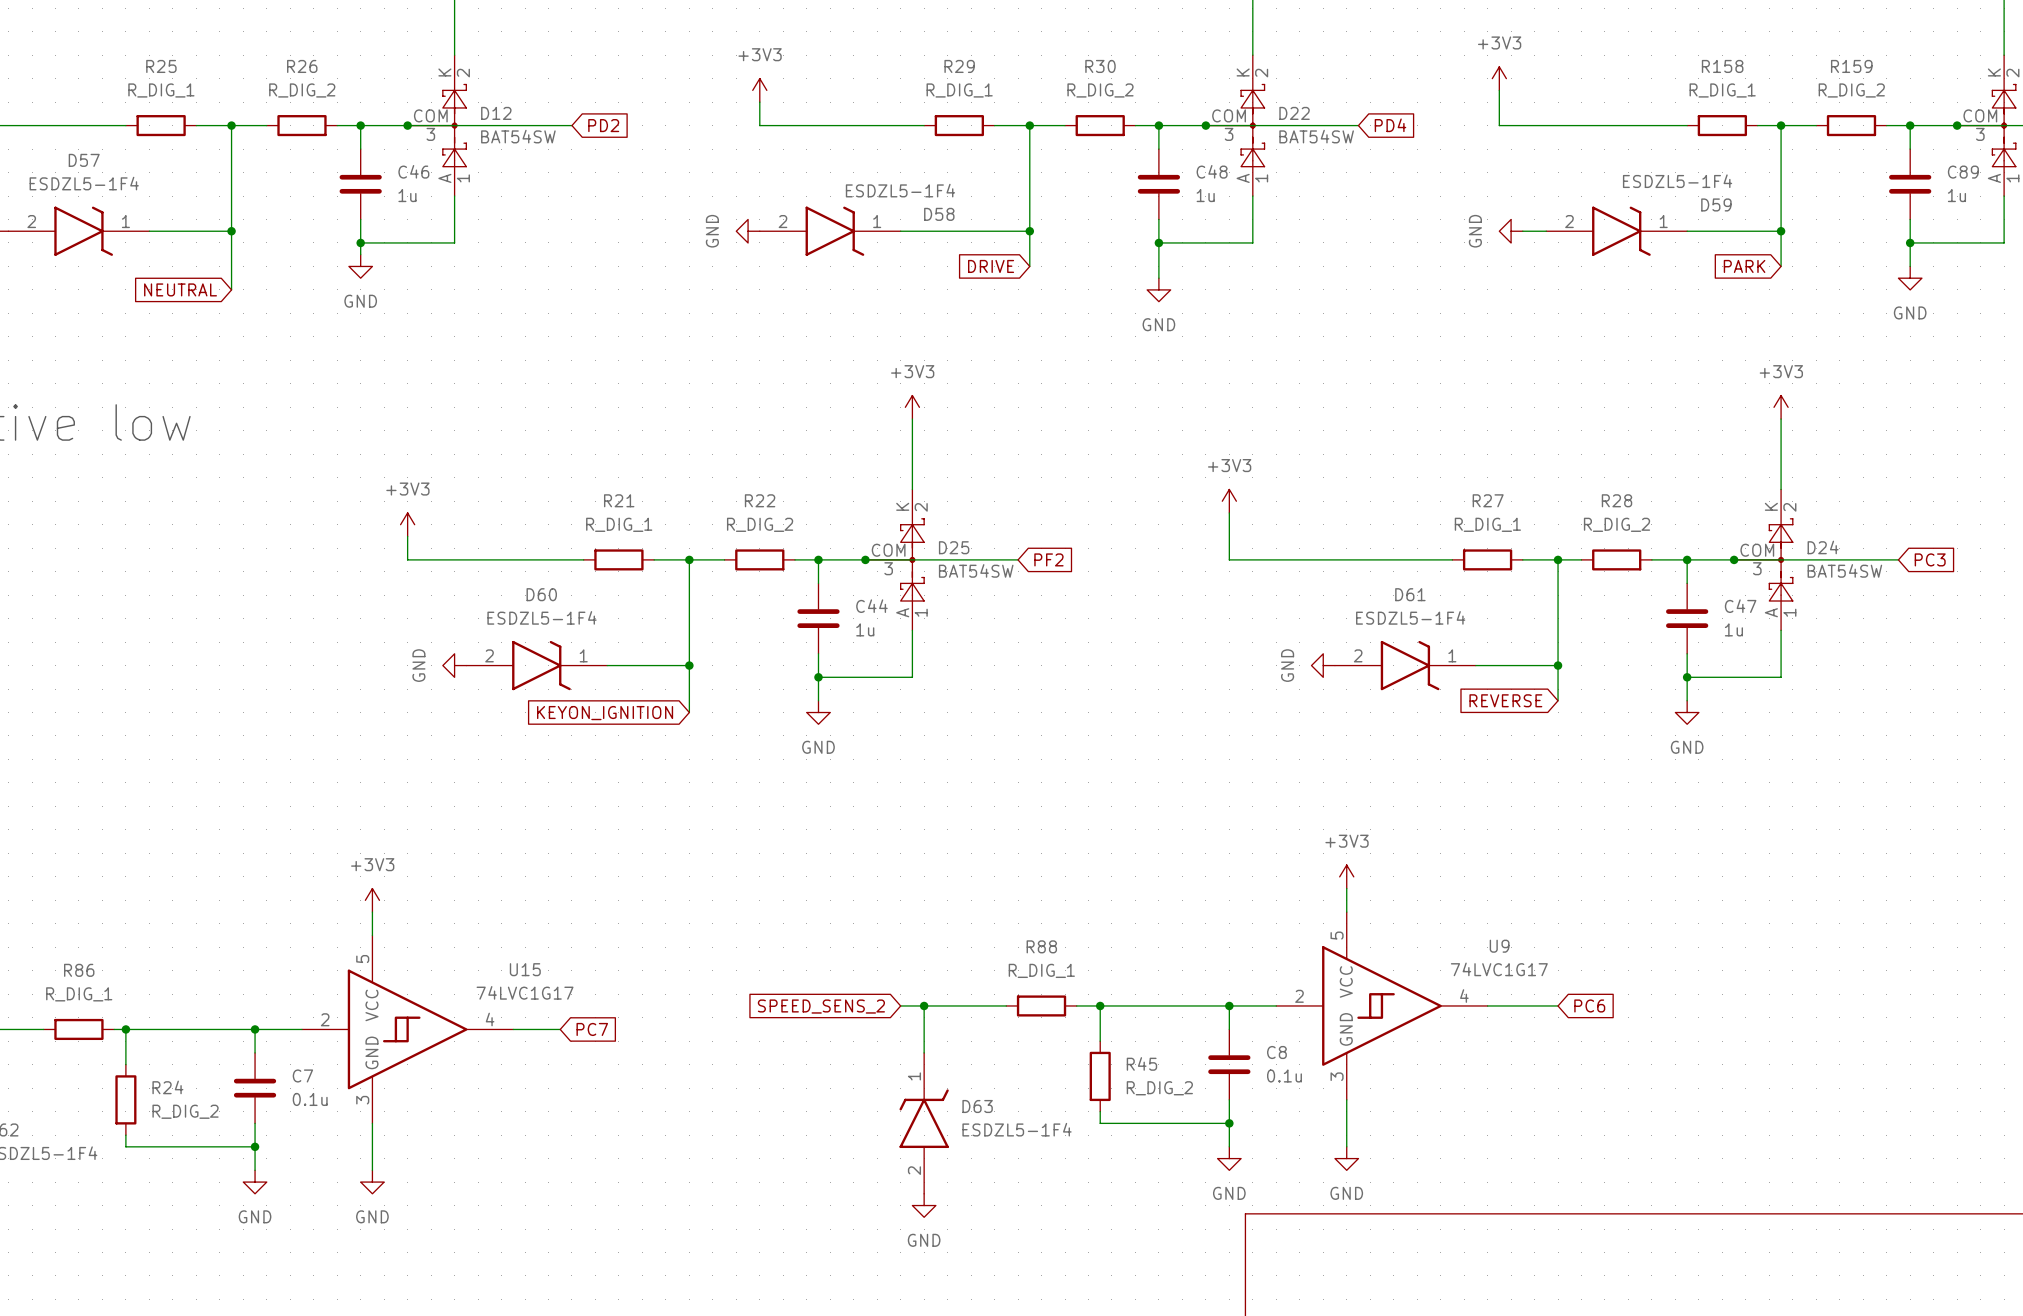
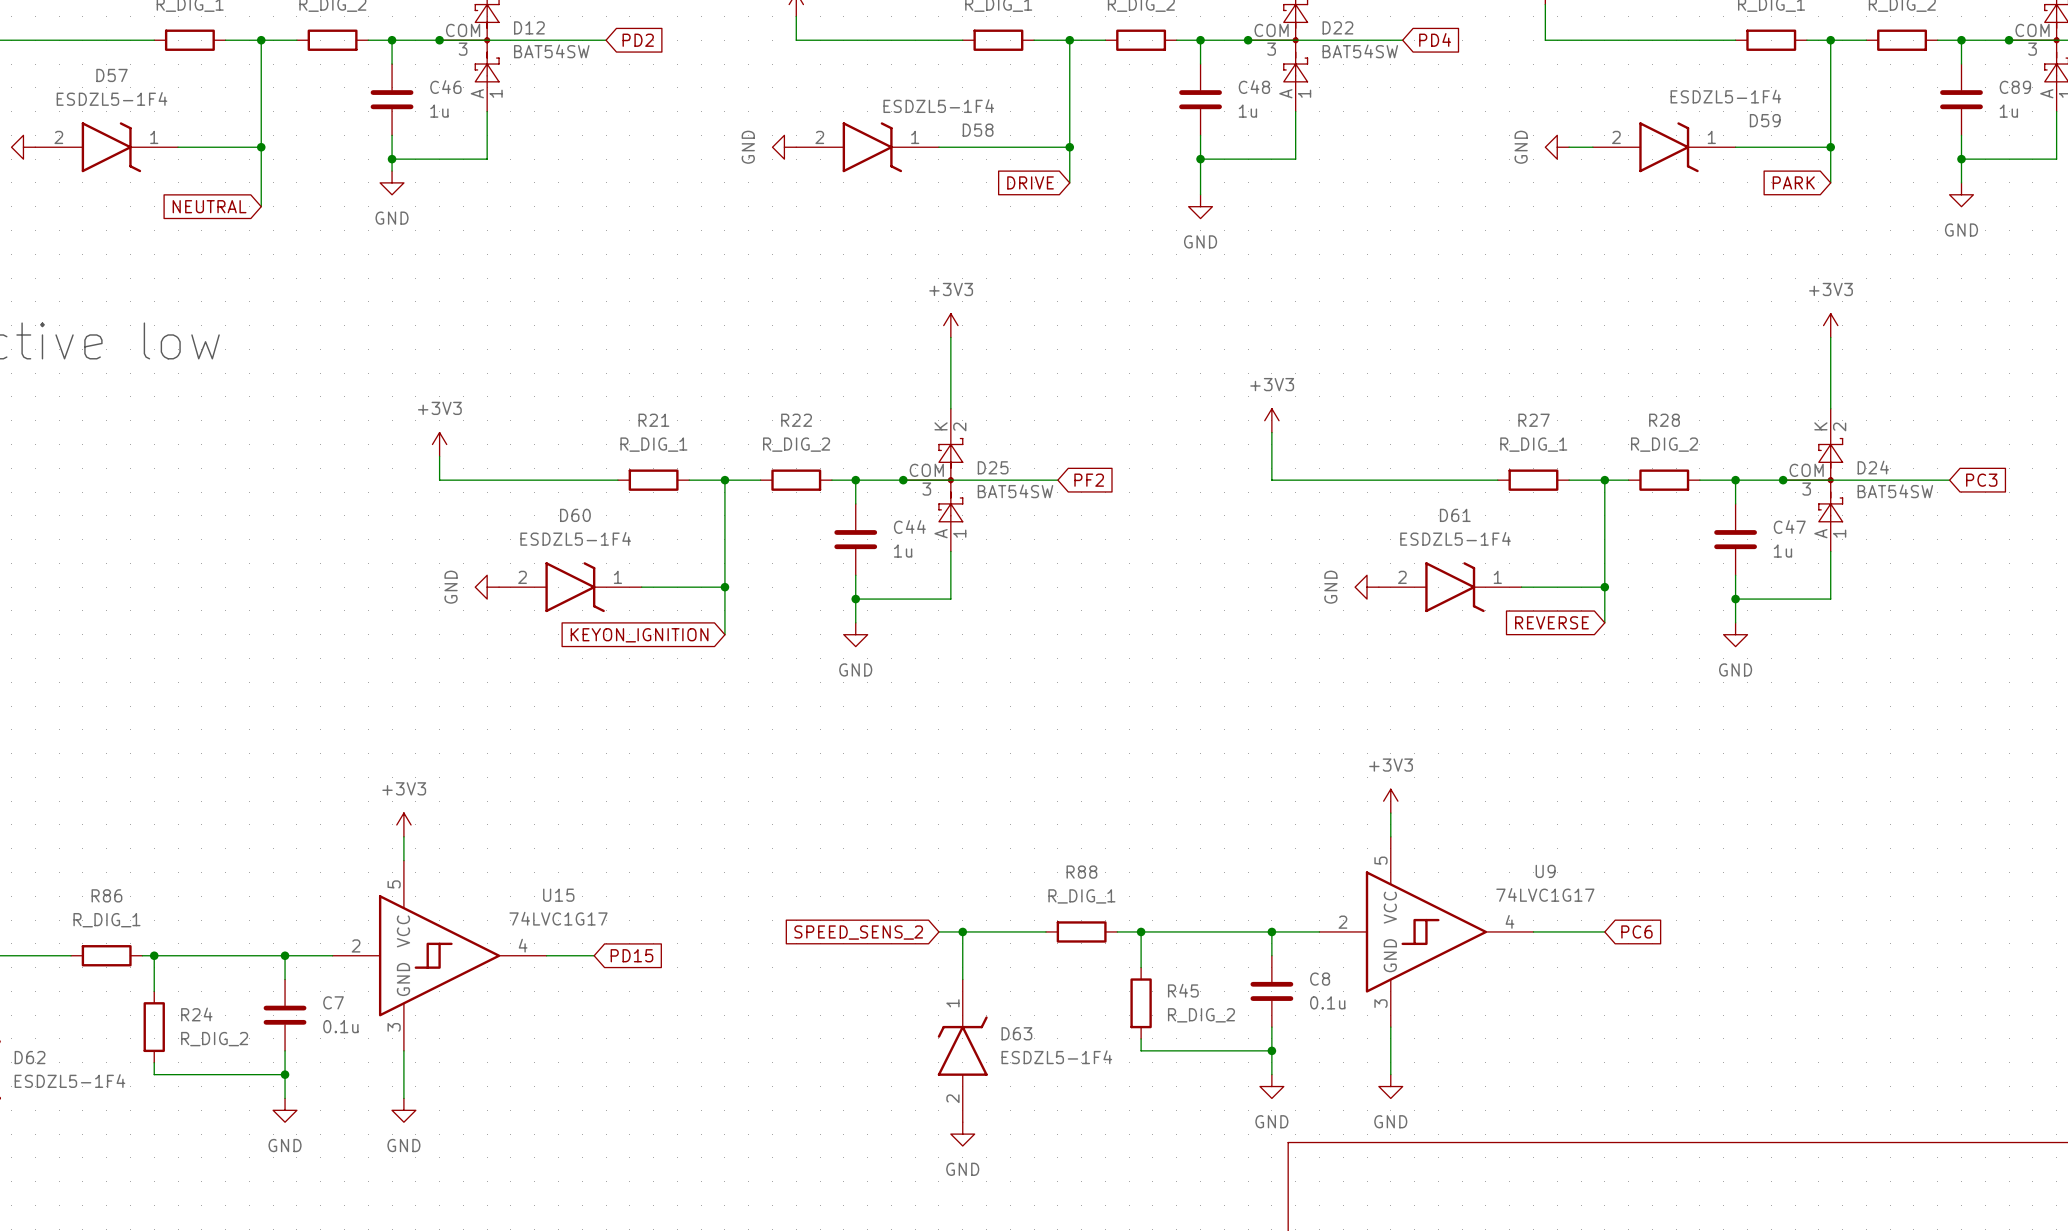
global label: PC7 (592, 1029) -> PD15 (631, 955)

